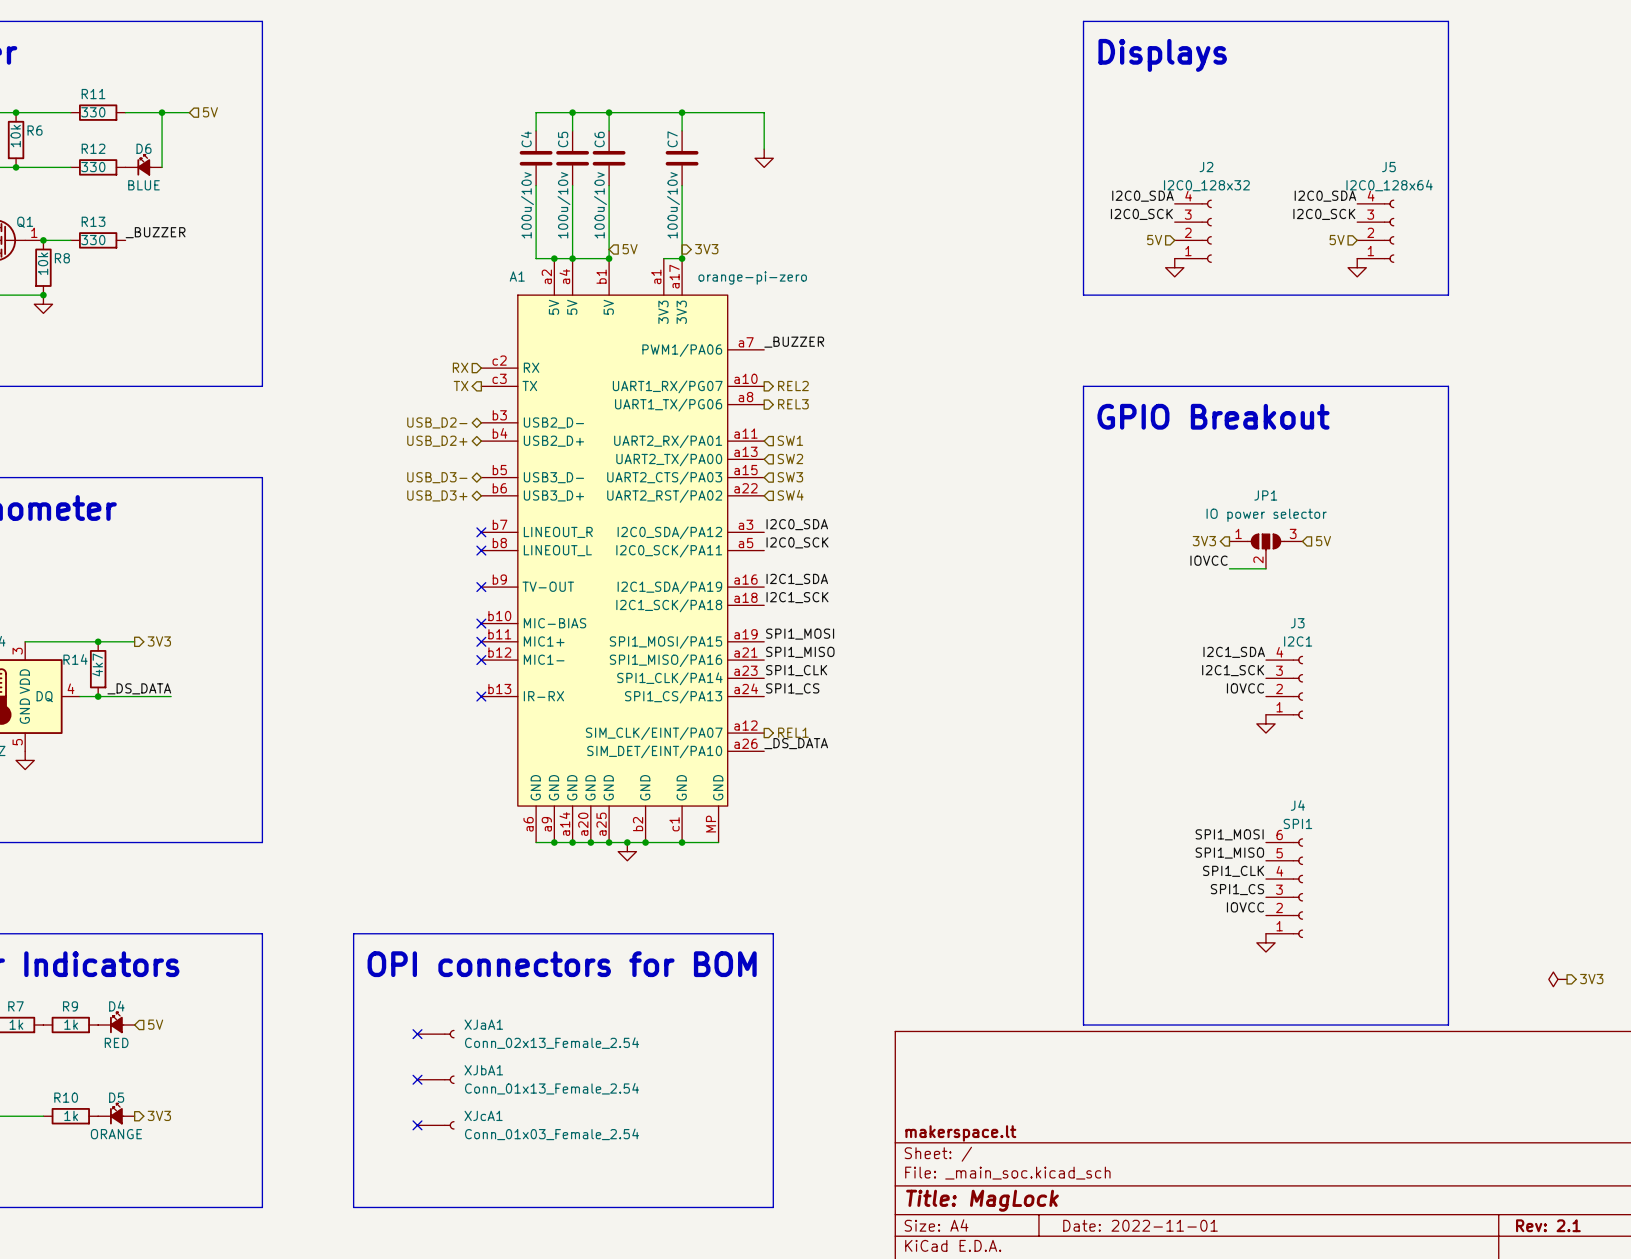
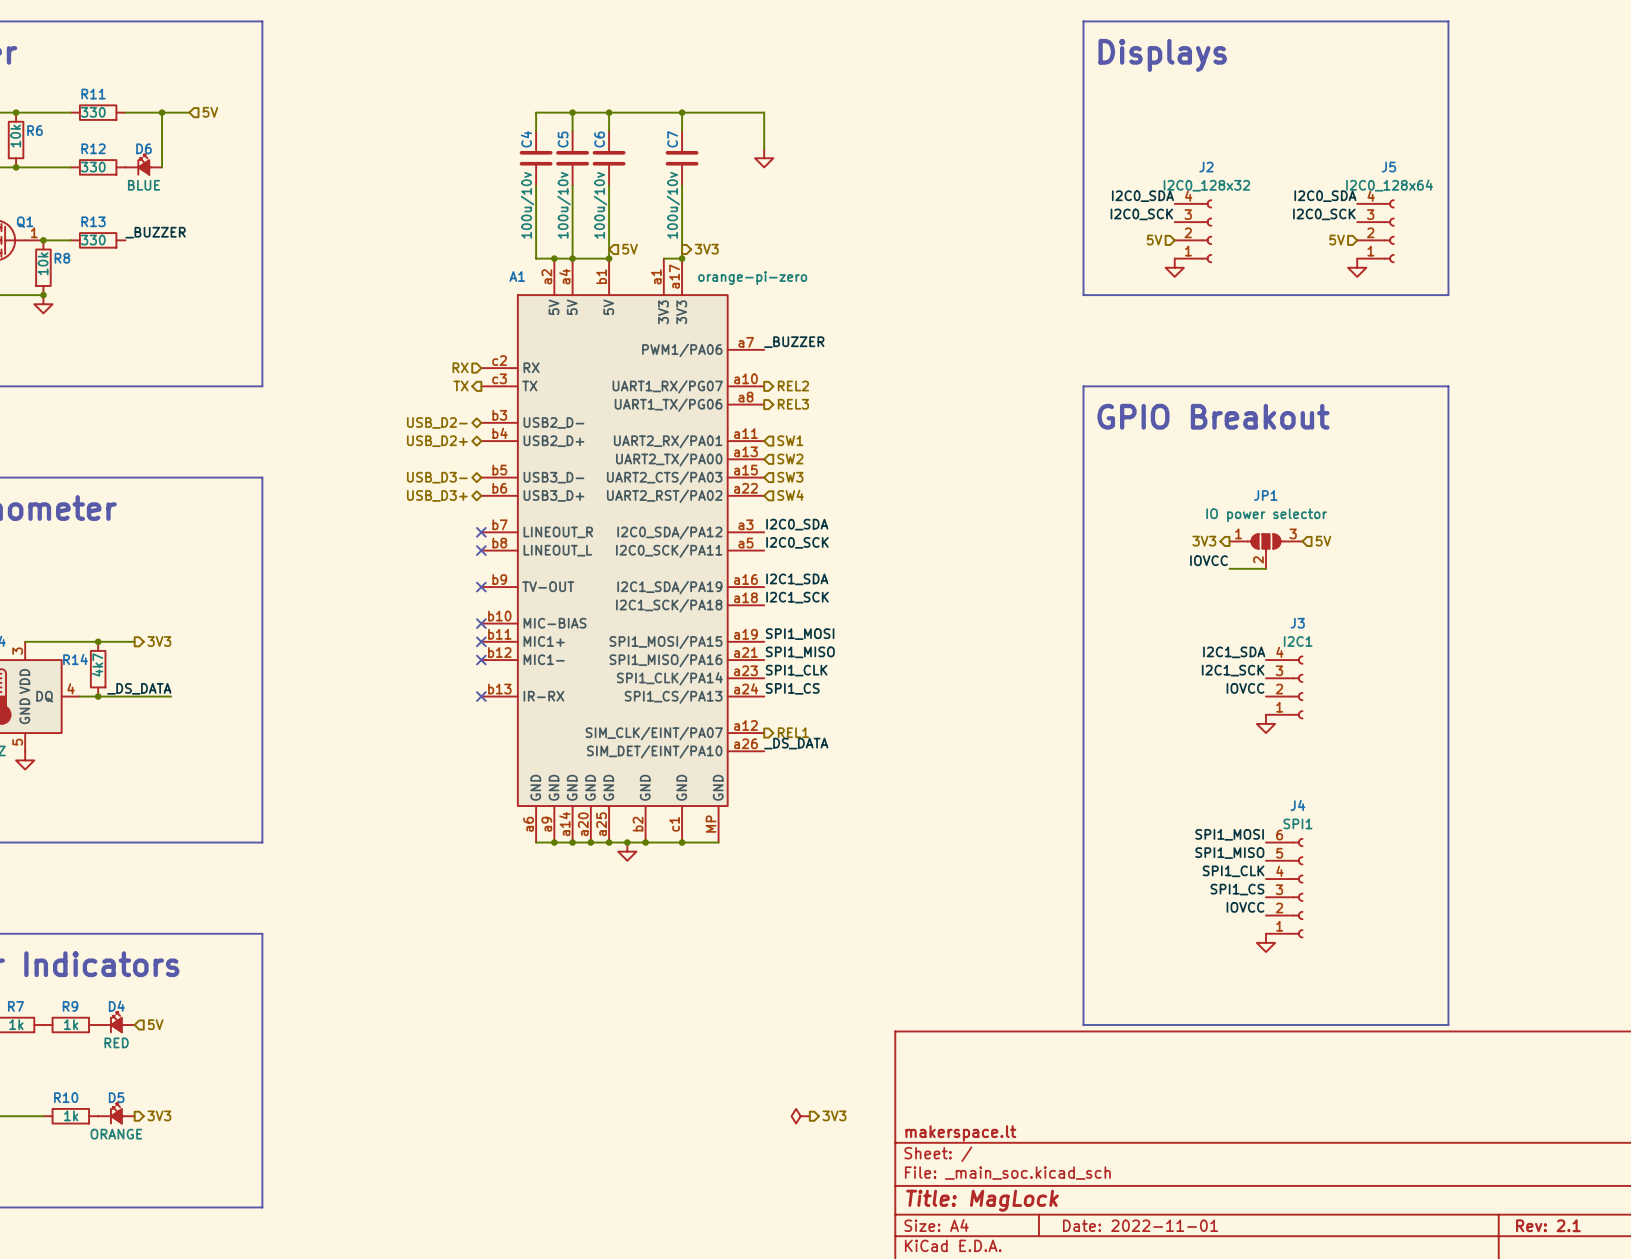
line: (353, 933) (773, 933) (773, 1207) (353, 1207) (353, 933) -> none
text: OPI connectors for BOM (562, 964) -> none
power symbol: (1557, 979) -> none
hierarchical label: 3V3 (1591, 979) -> none
no-connect mark: (417, 1034) -> none
XJaA1: Conn_02x13_Female_2.54 (436, 1034) -> none
no-connect mark: (417, 1079) -> none
XJbA1: Conn_01x13_Female_2.54 (436, 1079) -> none
hierarchical label: none -> 3V3 (834, 1115)
power symbol: none -> (800, 1116)
no-connect mark: (417, 1125) -> none
XJcA1: Conn_01x03_Female_2.54 (436, 1125) -> none

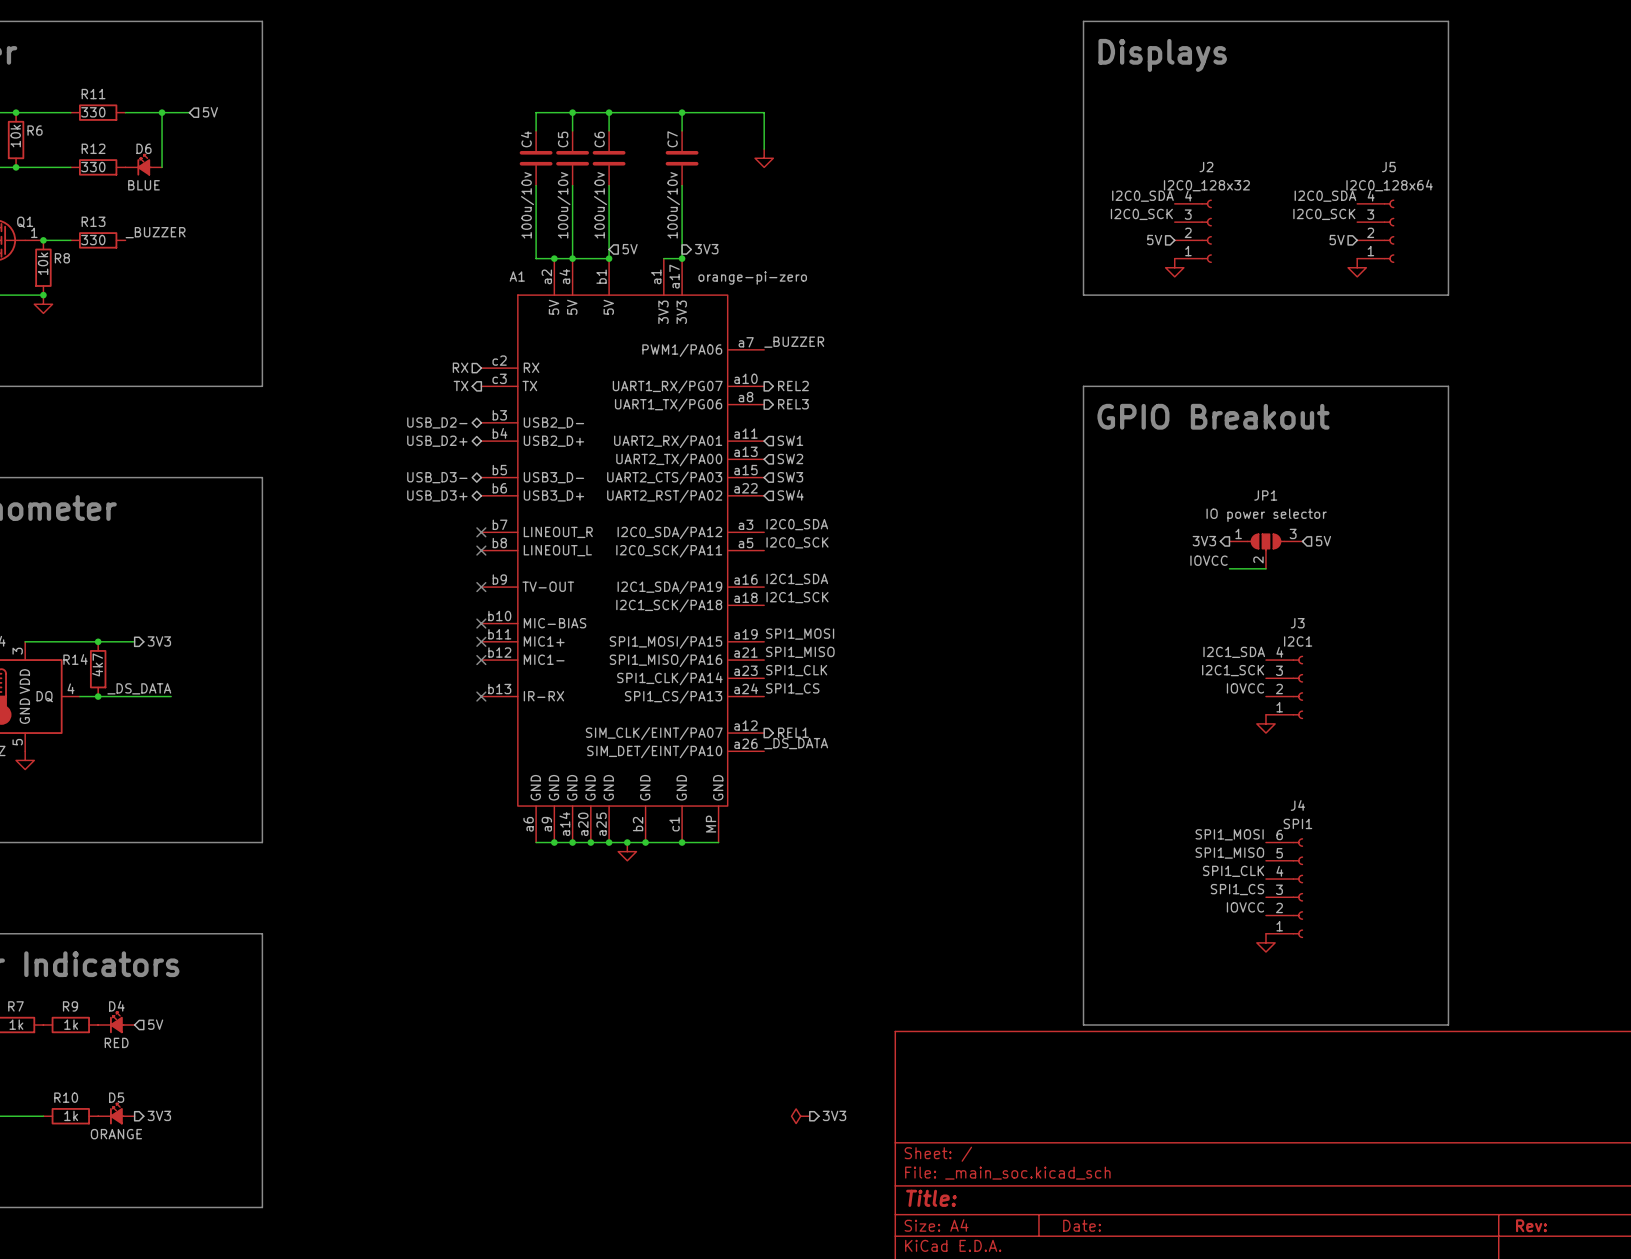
title block: makerspace.lt (960, 1133) -> none
title block: Title: MagLock (982, 1200) -> Title: (931, 1198)
title block: Date: 2022-11-01 (1140, 1225) -> Date: (1082, 1225)
title block: Rev: 2.1 (1548, 1225) -> Rev: (1531, 1225)

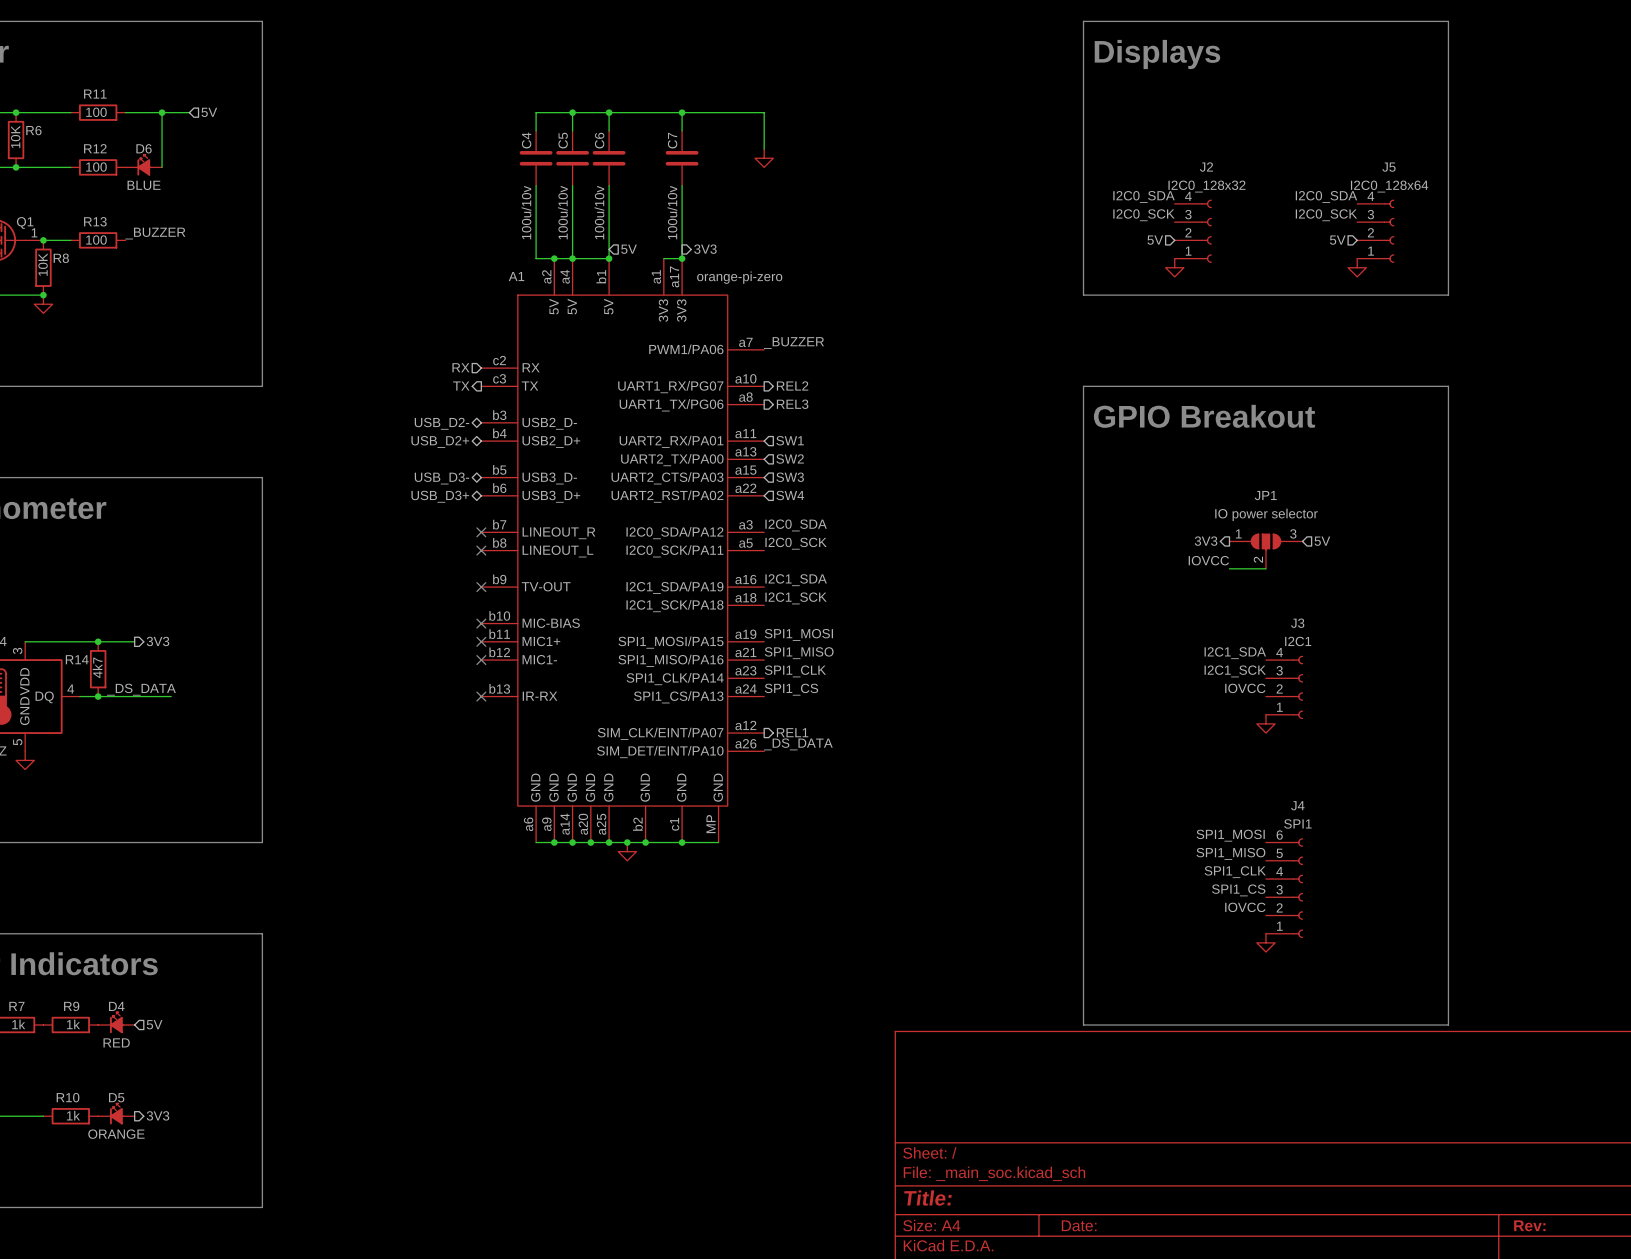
R11 value: 330 (93, 112) -> 100 (96, 112)
R6 value: 10k (15, 136) -> 10K (15, 136)
R12 value: 330 (93, 167) -> 100 (96, 167)
R13 value: 330 (93, 240) -> 100 (96, 240)
R8 value: 10k (43, 263) -> 10K (43, 264)
hierarchical label: 3V3 (834, 1115) -> none
power symbol: (800, 1116) -> none

